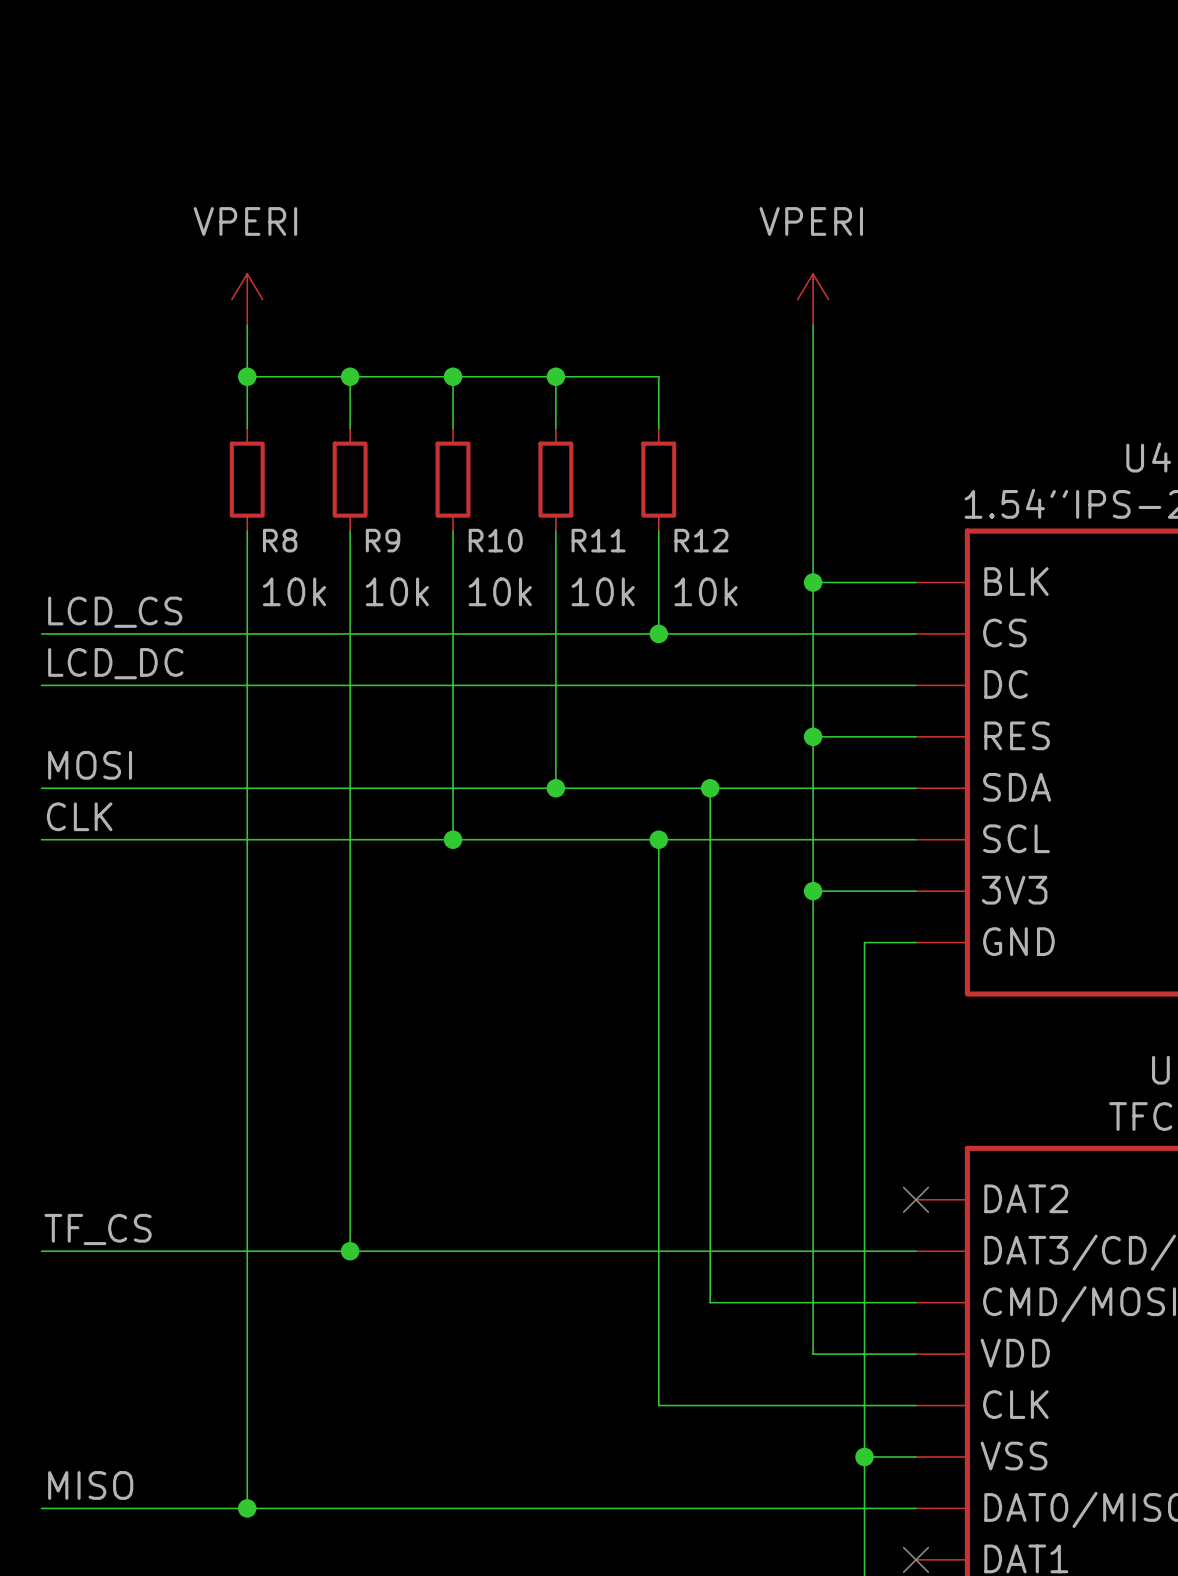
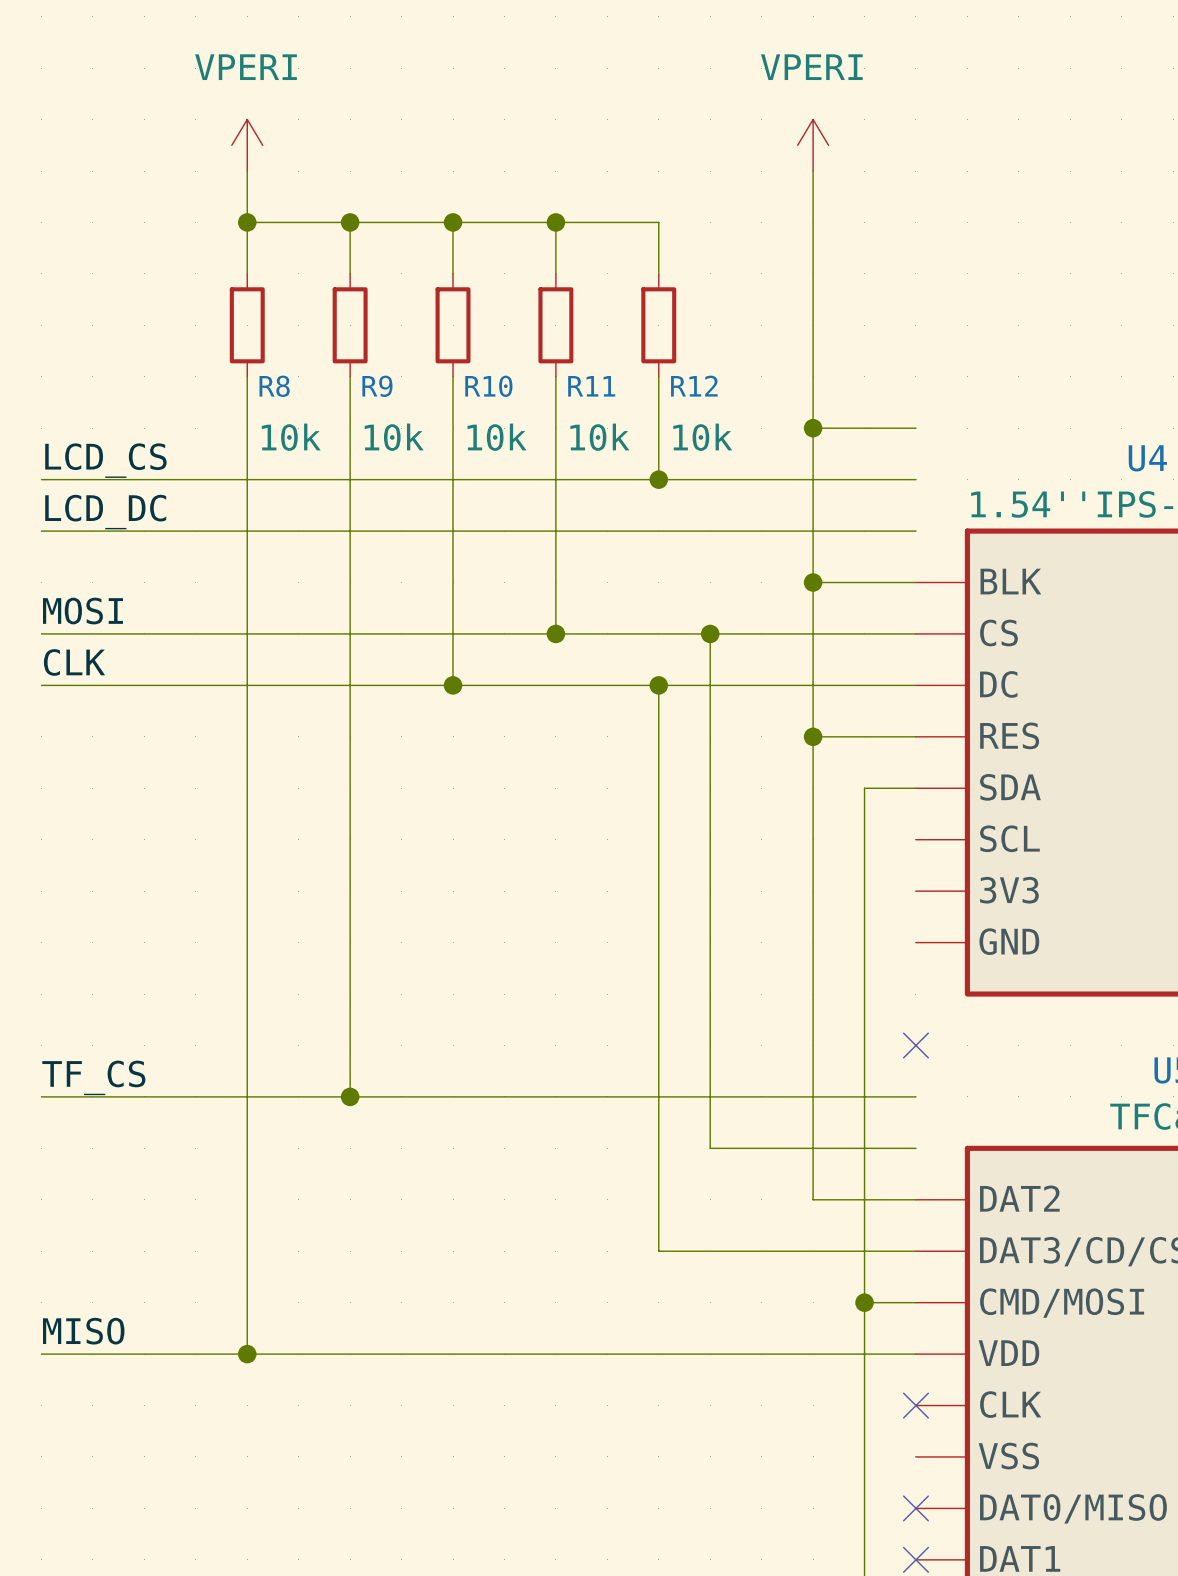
wire: none -> (247, 171) (247, 273)
wire: none -> (813, 171) (813, 325)
wire: none -> (247, 222) (658, 222) (658, 273)
junction: none -> (247, 222)
wire: none -> (350, 222) (350, 273)
junction: none -> (350, 222)
wire: none -> (453, 222) (453, 273)
junction: none -> (453, 222)
wire: none -> (555, 222) (555, 273)
junction: none -> (555, 222)
power symbol position: VPERI (247, 299) -> VPERI (247, 145)
power symbol position: VPERI (813, 299) -> VPERI (813, 145)
wire: (247, 325) (247, 376) (658, 376) -> none
junction: (247, 376) -> none
junction: (350, 376) -> none
junction: (453, 376) -> none
junction: (555, 376) -> none
wire: none -> (247, 428) (247, 531)
wire: none -> (350, 428) (350, 531)
wire: none -> (453, 428) (453, 531)
wire: none -> (658, 428) (658, 479)
junction: none -> (813, 428)
label: none -> LCD_CS (105, 460)
wire: none -> (41, 479) (915, 479)
R8 position: (247, 479) -> (247, 325)
R9 position: (350, 479) -> (350, 325)
R10 position: (453, 479) -> (453, 325)
R11 position: (555, 479) -> (555, 325)
junction: none -> (658, 479)
R12 position: (658, 479) -> (658, 325)
label: none -> LCD_DC (105, 512)
wire: none -> (41, 531) (915, 531)
wire: (658, 531) (658, 633) -> (555, 428) (555, 531)
label: LCD_CS (115, 612) -> MOSI (82, 611)
wire: (555, 633) (555, 788) -> (658, 685) (658, 839)
junction: none -> (555, 633)
junction: (658, 633) -> none
junction: none -> (710, 633)
label: LCD_DC (115, 663) -> CLK (74, 662)
wire: (453, 685) (453, 839) -> (710, 633) (710, 788)
junction: none -> (453, 685)
junction: none -> (658, 685)
label: MOSI (90, 765) -> none
wire: (41, 788) (864, 788) -> none
junction: (555, 788) -> none
junction: (710, 788) -> none
label: CLK (79, 816) -> none
wire: (41, 839) (915, 839) -> (41, 1096) (915, 1096)
junction: (453, 839) -> none
junction: (658, 839) -> none
wire: (813, 891) (915, 891) -> (813, 428) (915, 428)
junction: (813, 891) -> none
wire: (864, 942) (915, 942) -> (864, 942) (864, 788)
no-connect mark: none -> (915, 1045)
wire: (350, 1096) (350, 1251) -> none
junction: none -> (350, 1096)
wire: (710, 1148) (710, 1302) (864, 1302) -> (710, 1148) (915, 1148)
wire: (813, 1199) (813, 1354) -> (813, 1199) (915, 1199)
no-connect mark: (915, 1199) -> none
label position: TF_CS (98, 1229) -> TF_CS (93, 1077)
wire: (41, 1251) (658, 1251) (658, 1405) (915, 1405) -> none
junction: (350, 1251) -> none
junction: none -> (864, 1302)
wire: none -> (41, 1354) (813, 1354)
wire: (247, 1354) (247, 1508) -> none
junction: none -> (247, 1354)
no-connect mark: none -> (915, 1405)
wire: (864, 1456) (915, 1456) -> none
junction: (864, 1456) -> none
label position: MISO (90, 1485) -> MISO (83, 1331)
wire: (41, 1508) (915, 1508) -> none
junction: (247, 1508) -> none
no-connect mark: none -> (915, 1508)

